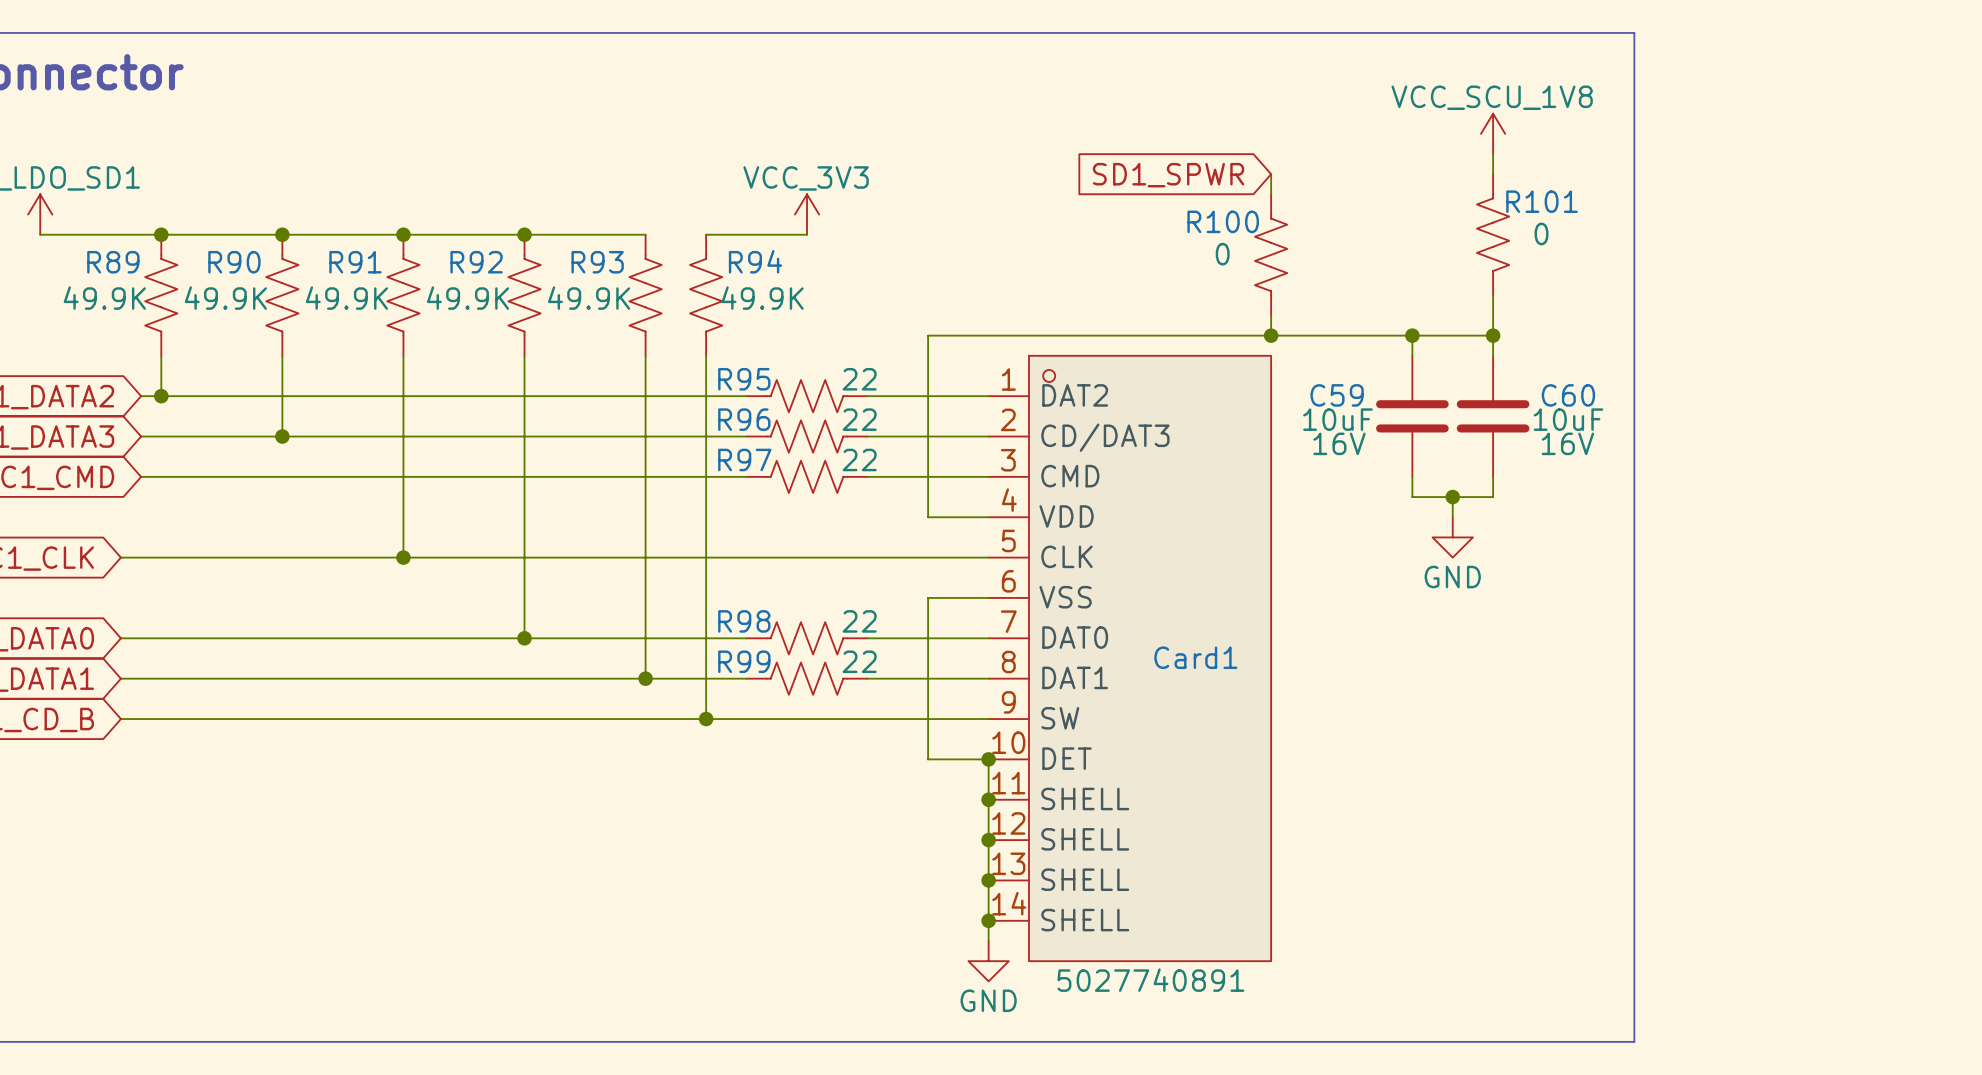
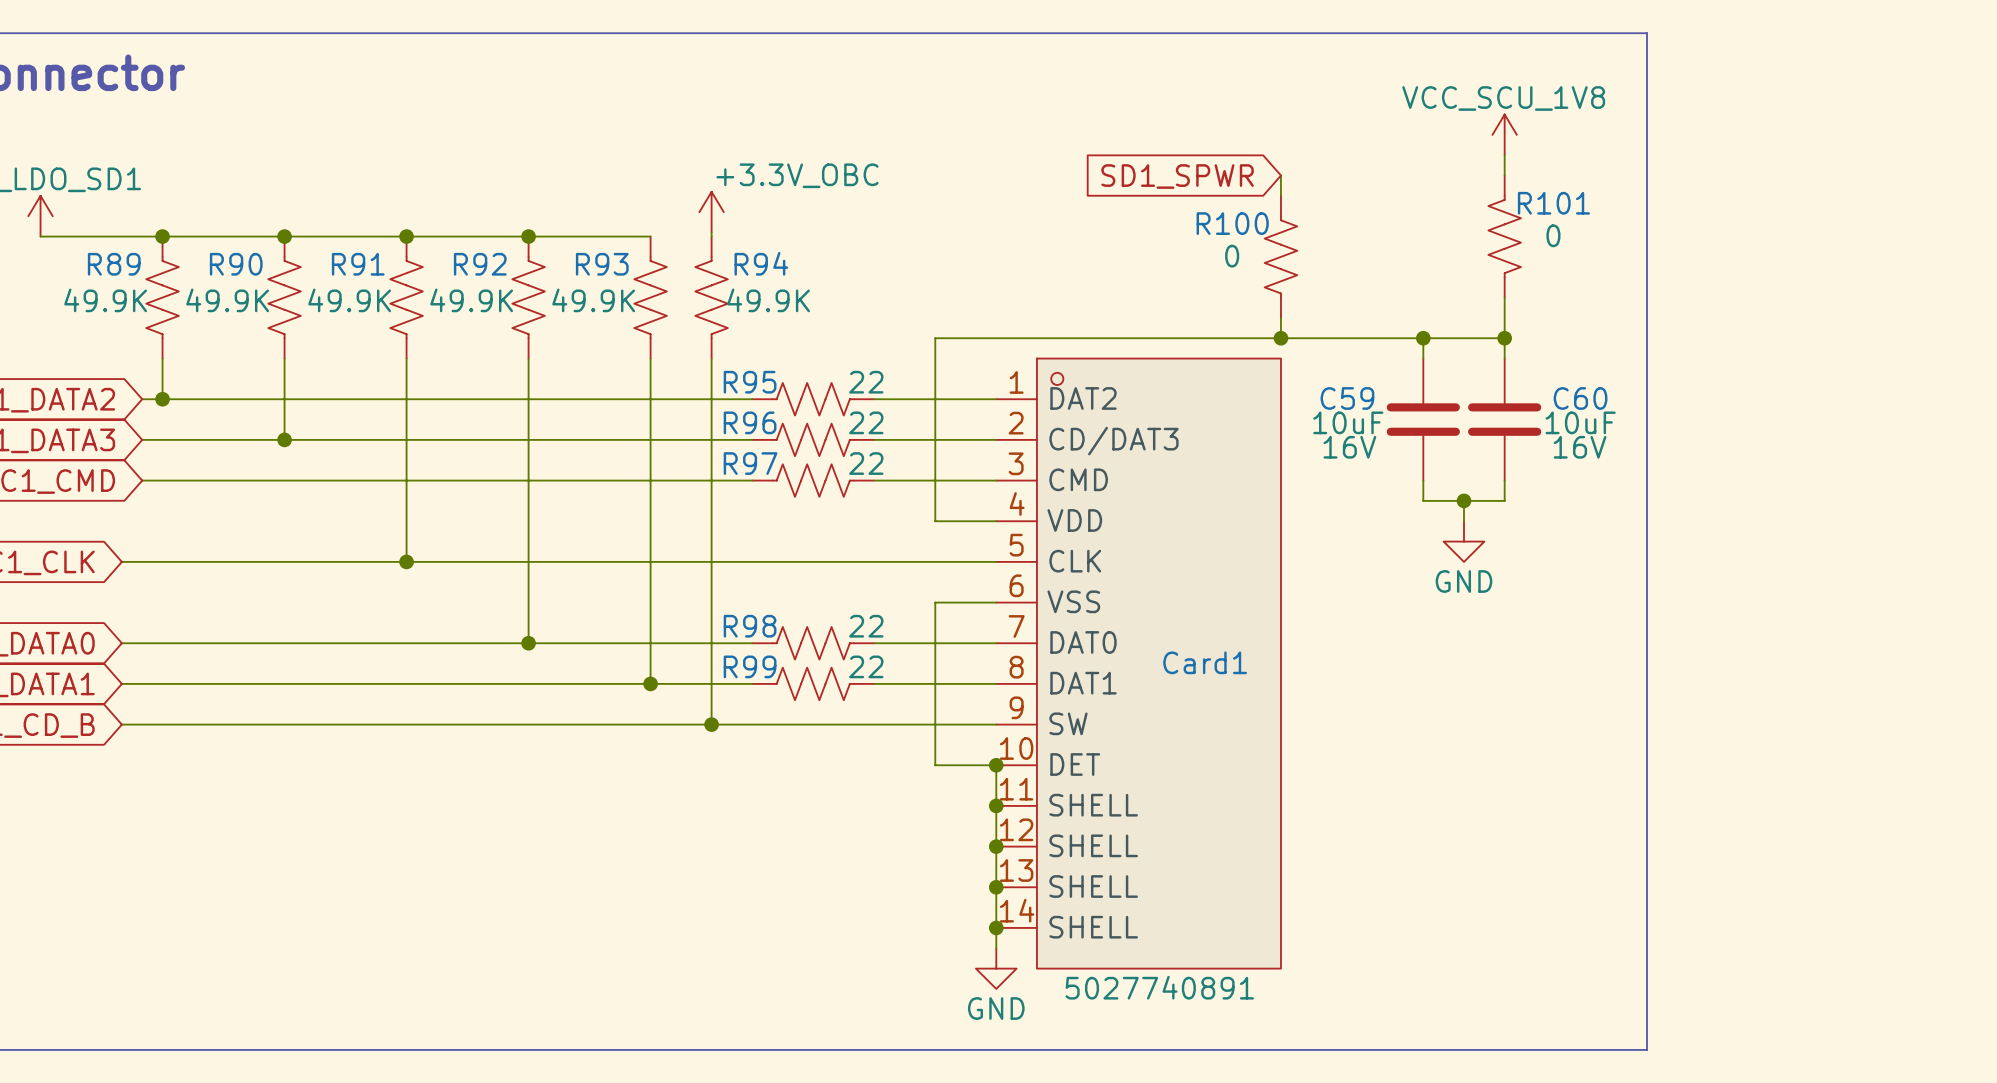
power symbol: none -> +3.3V_OBC (711, 212)
power symbol: VCC_3V3 (807, 214) -> none
wire: (706, 234) (807, 234) -> (711, 236) (711, 232)

